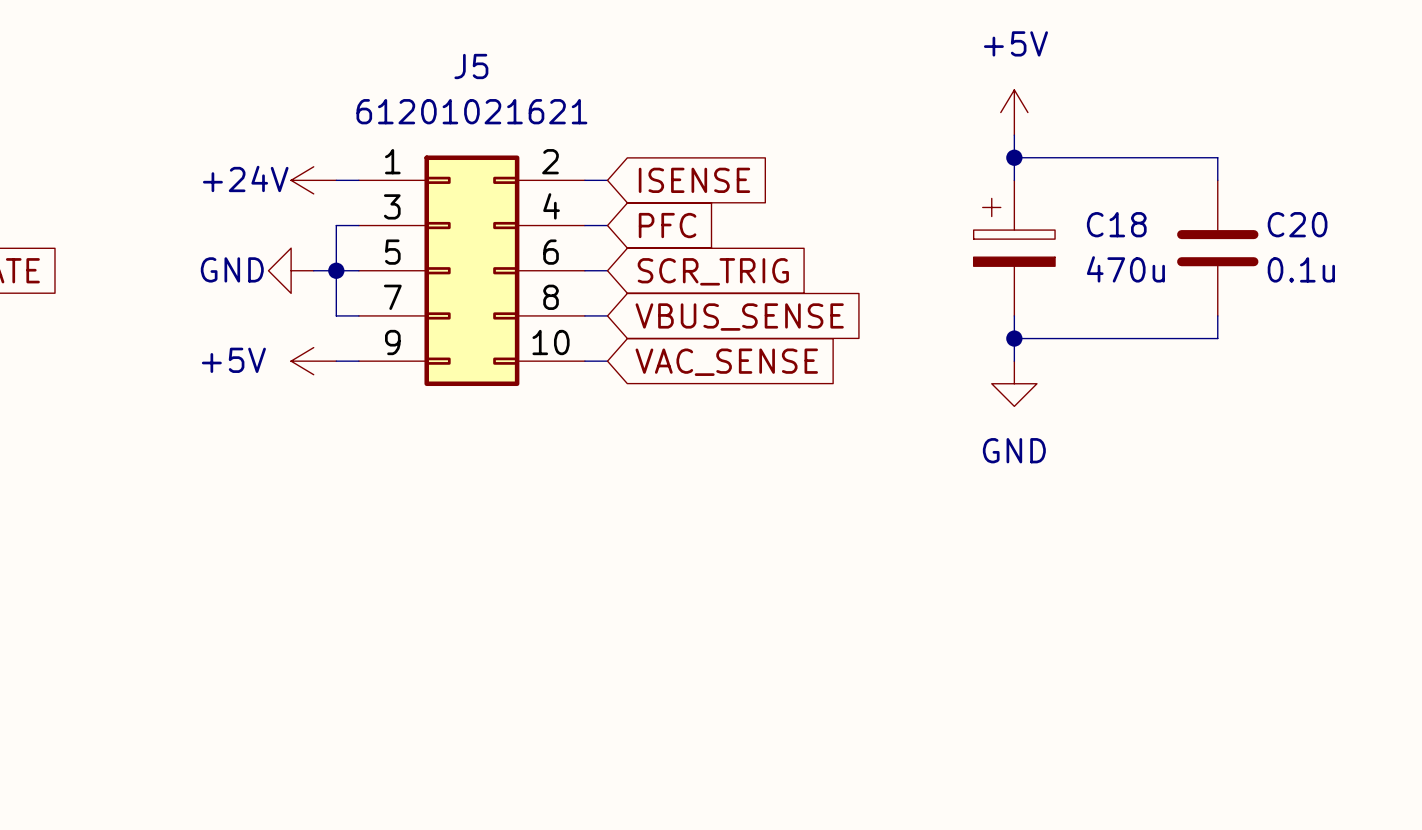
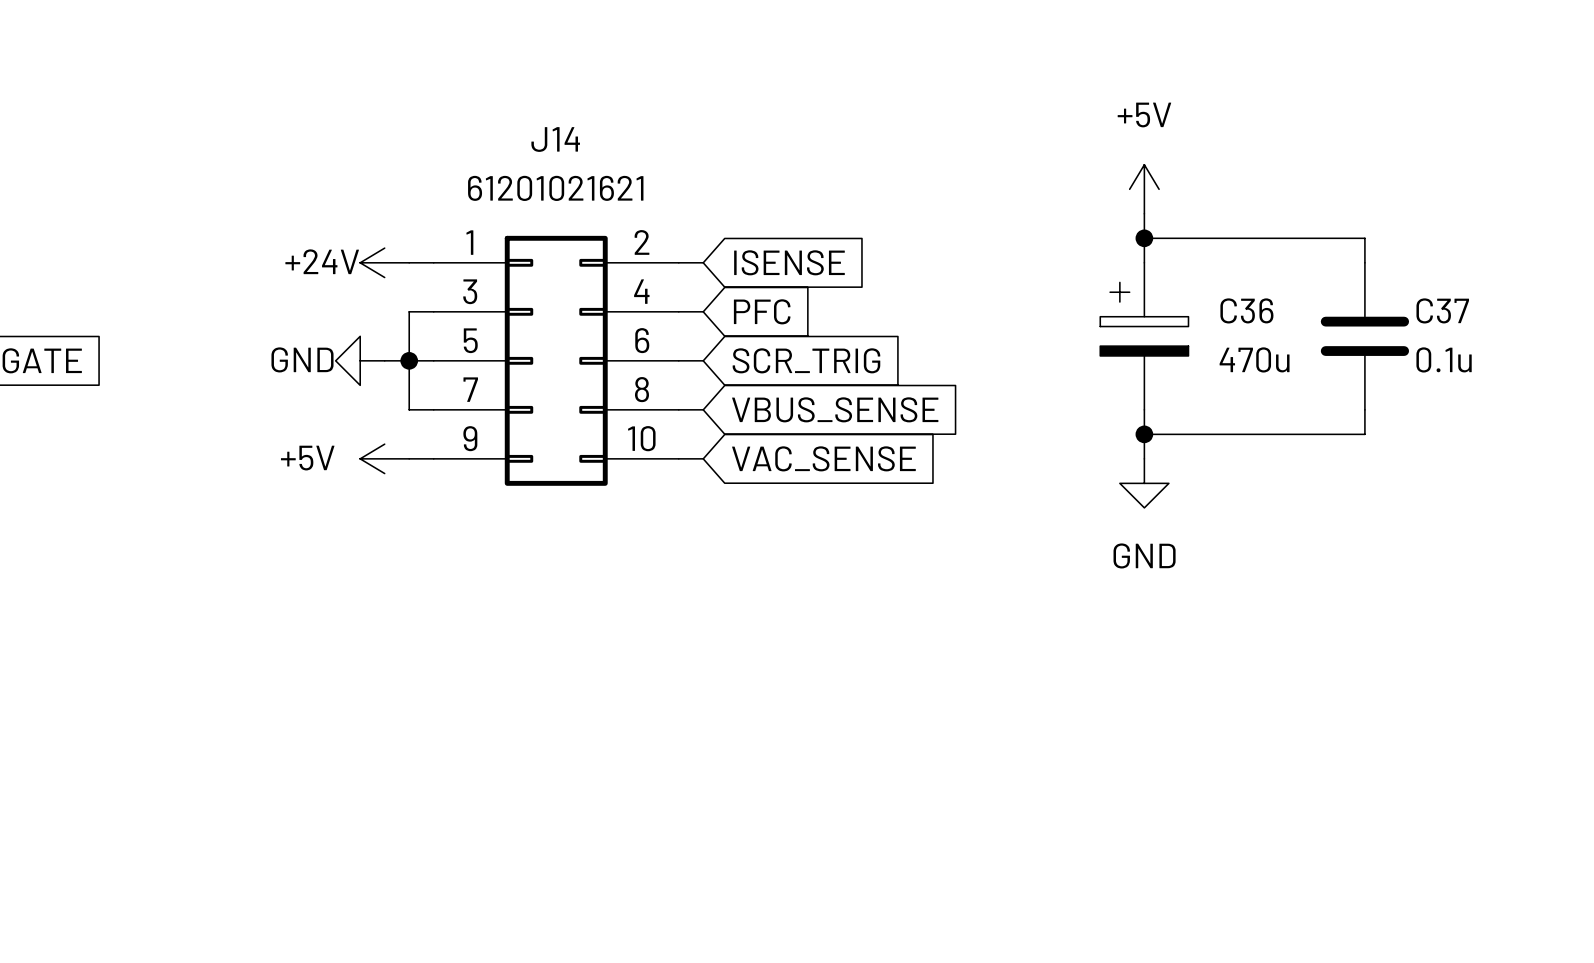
J5 name: J5 (471, 66) -> J14 (555, 139)
C18 name: C18 (1116, 224) -> C36 (1246, 310)
C20 name: C20 (1297, 224) -> C37 (1442, 310)

